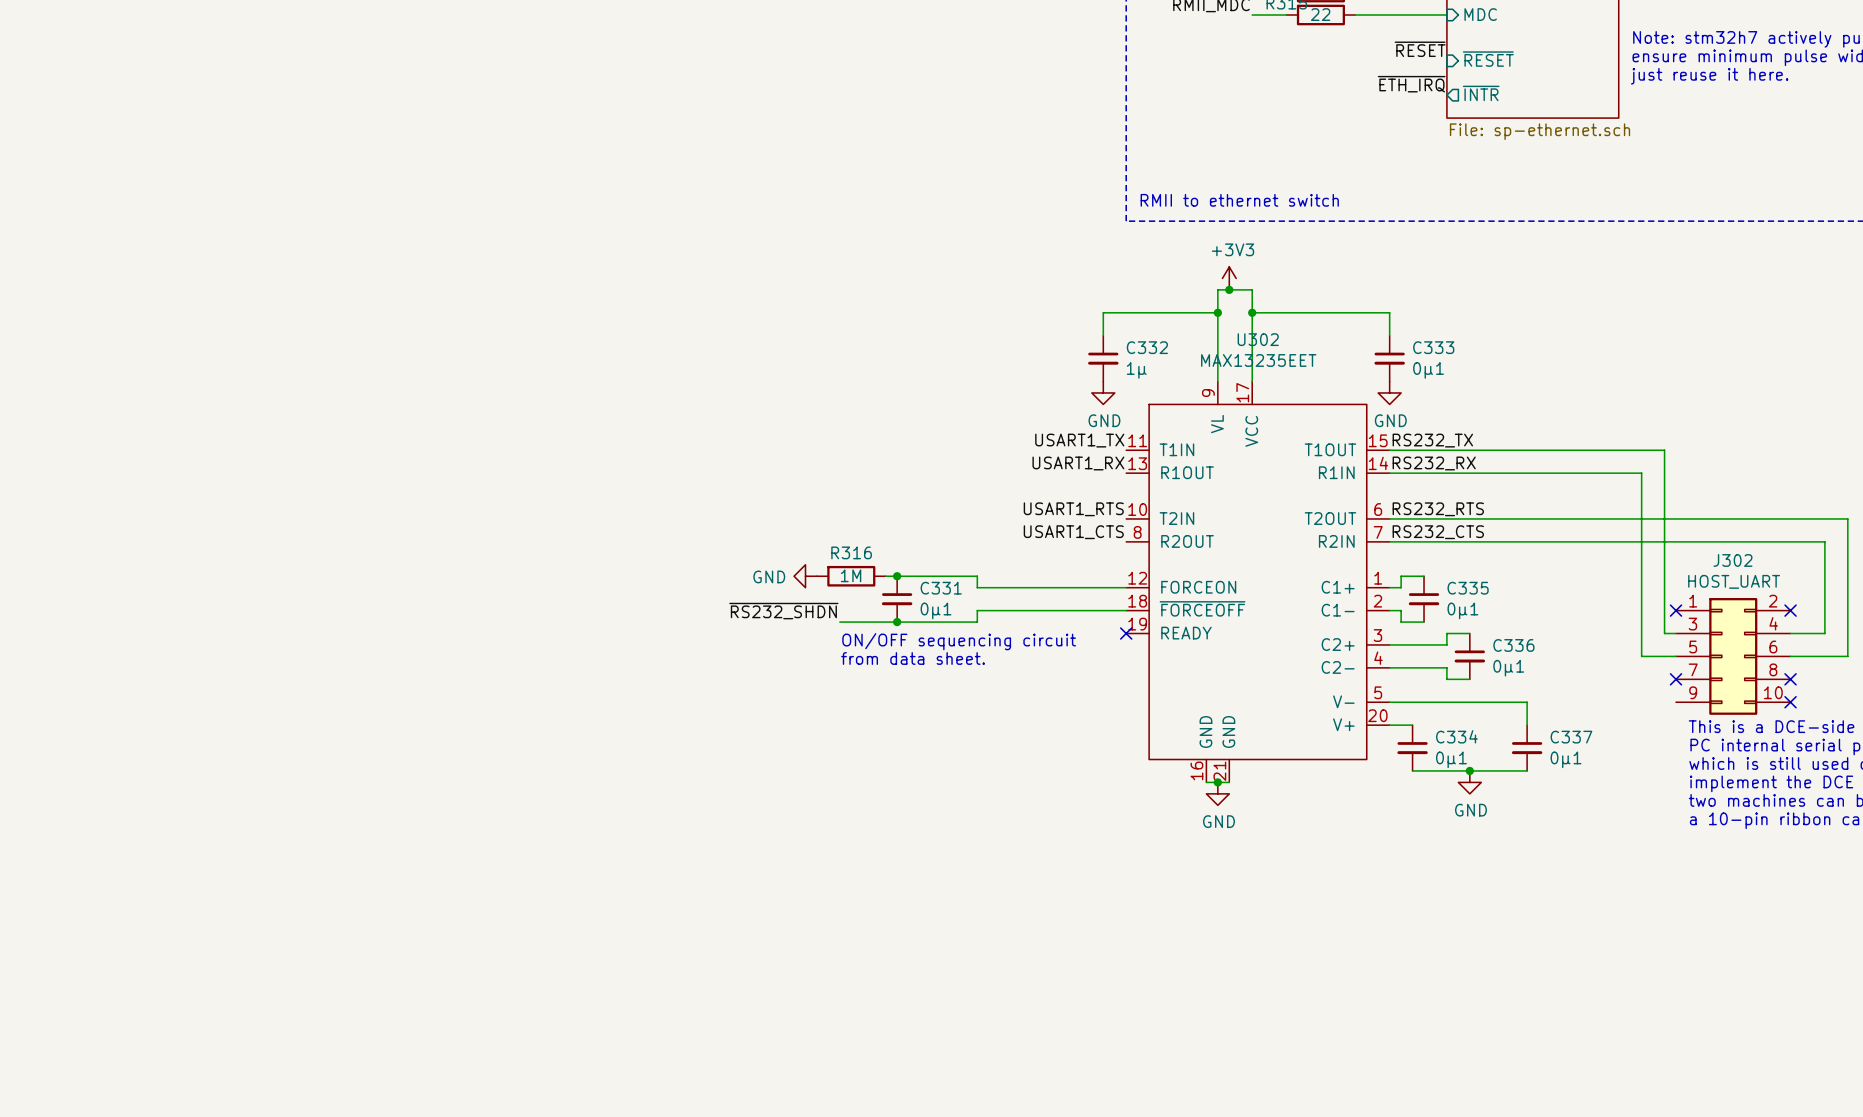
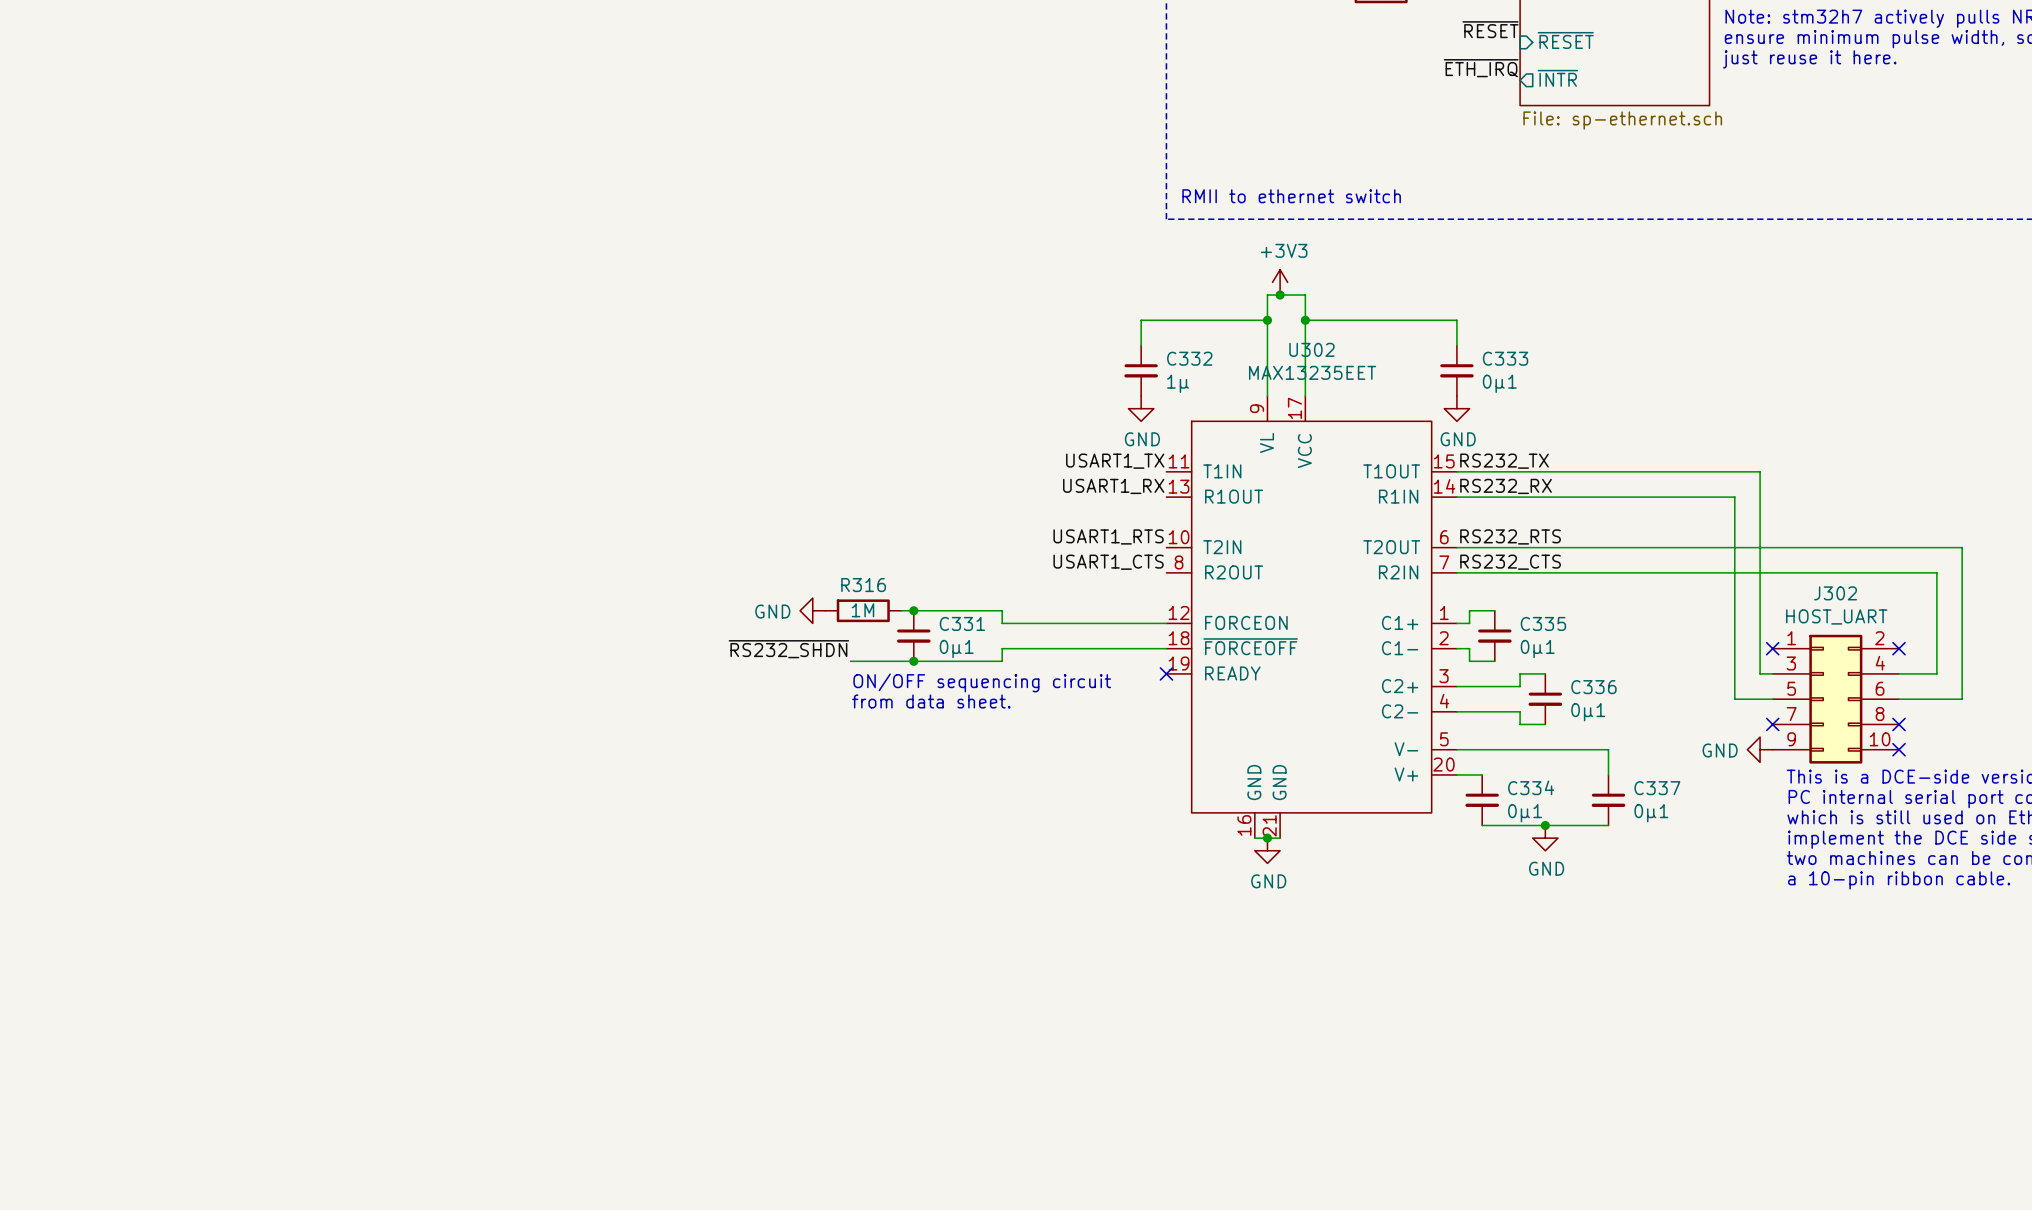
power symbol: none -> GND (1760, 749)

